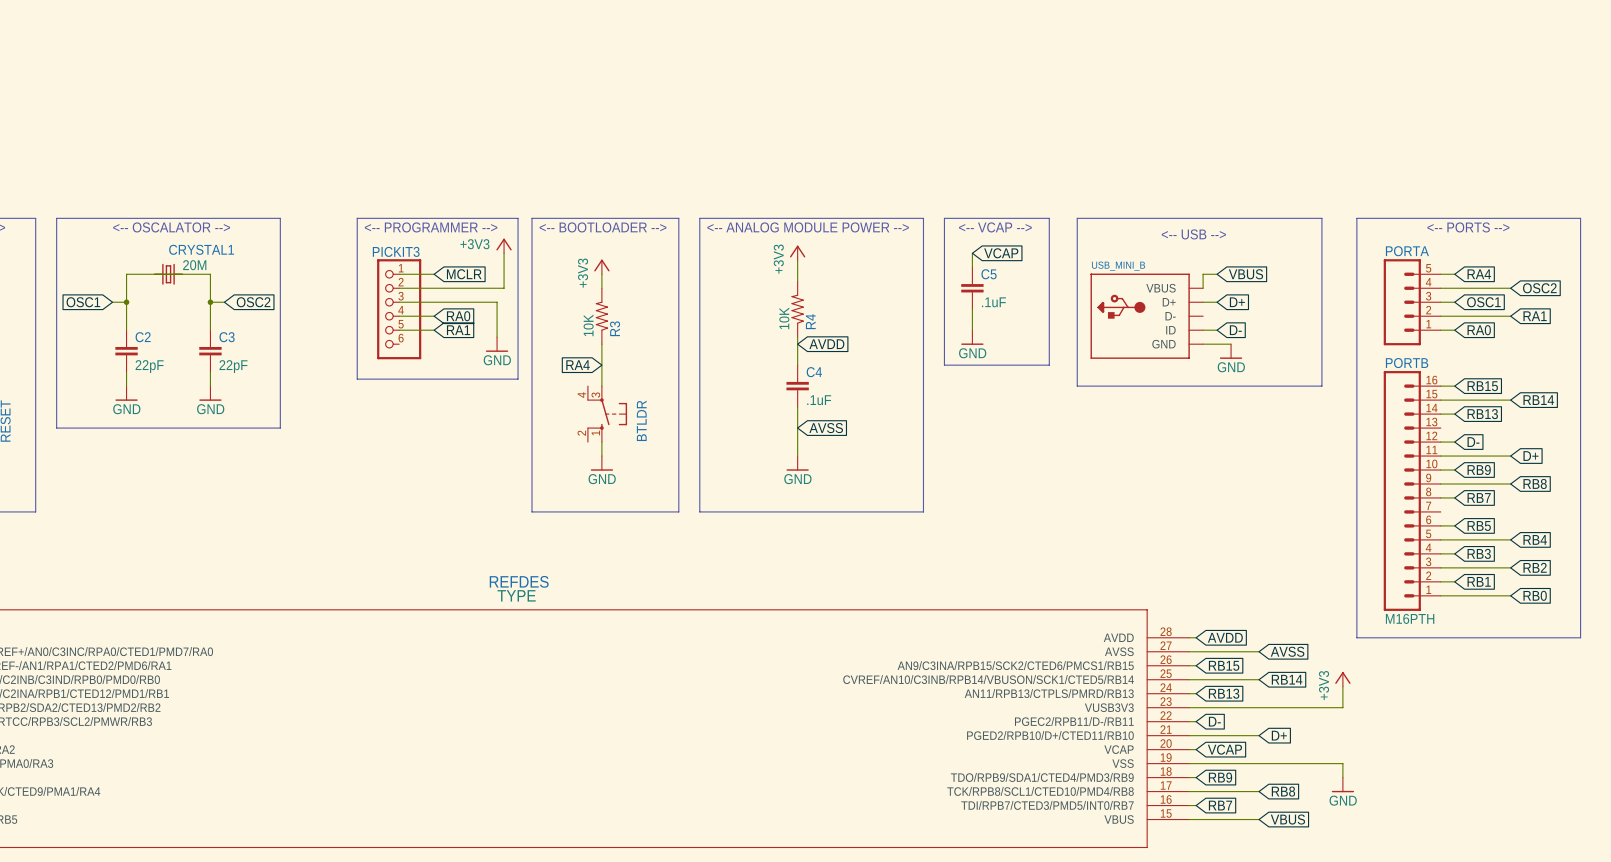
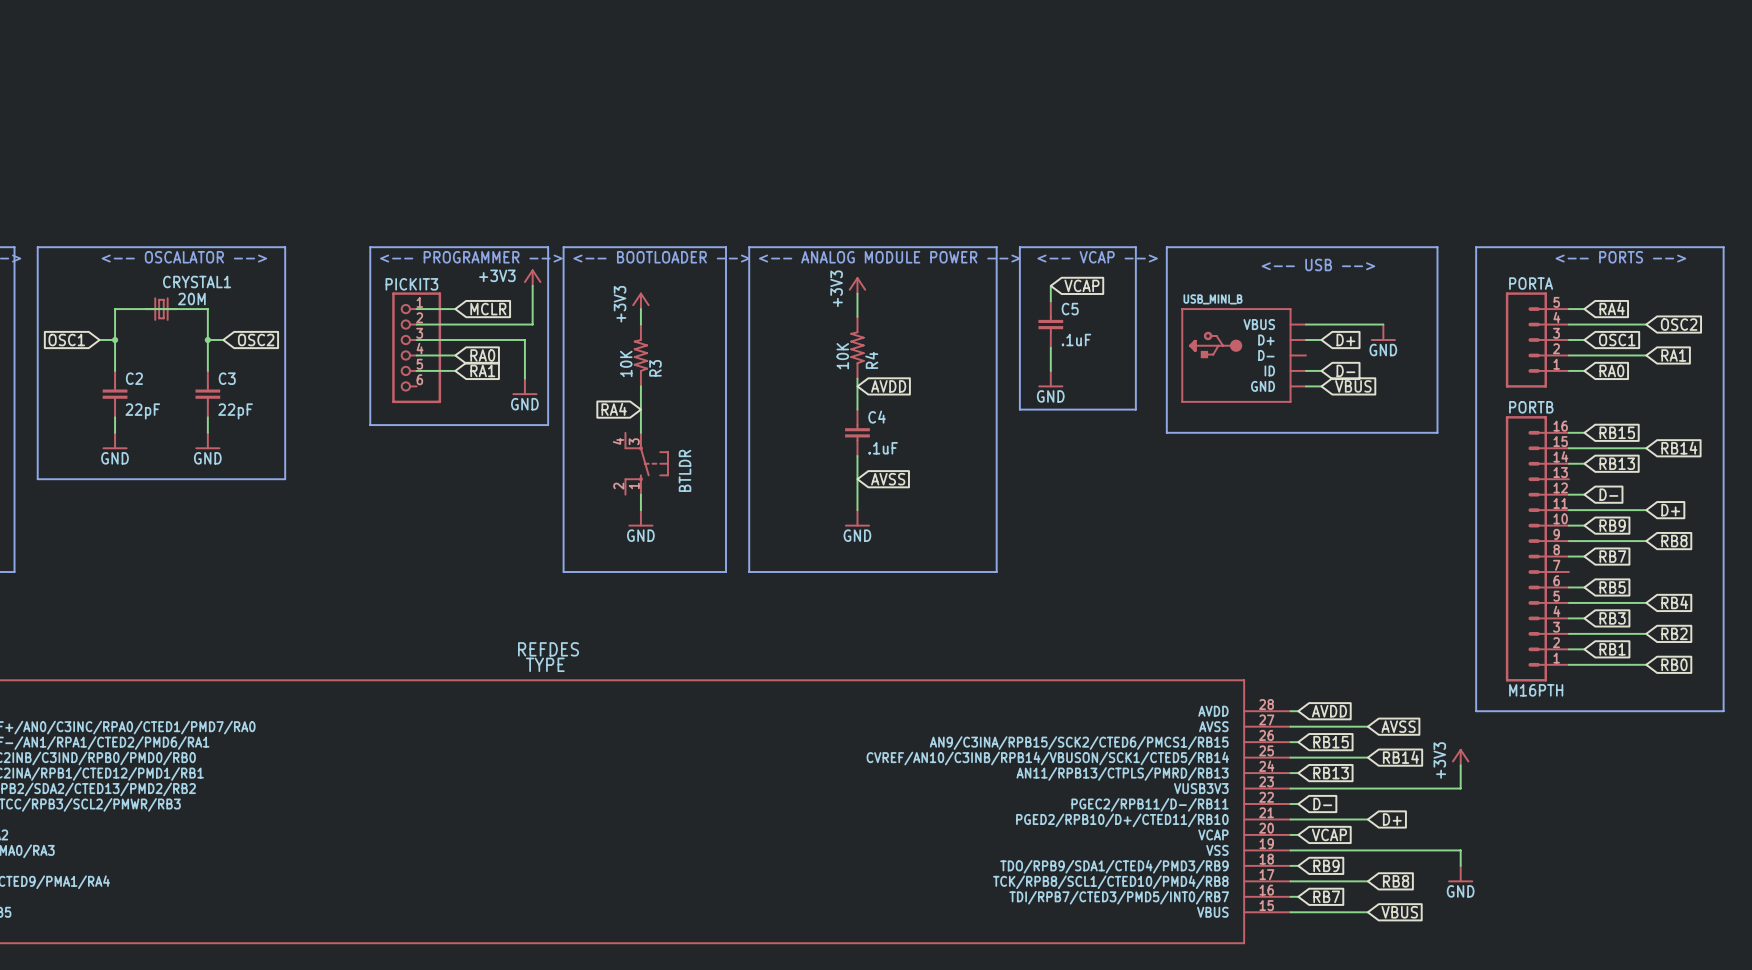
wire: (1217, 274) (1203, 274) (1203, 288) -> (1383, 324) (1306, 324)
global label position: VBUS (1245, 274) -> VBUS (1353, 386)
wire: (1217, 344) (1231, 344) -> none
power symbol position: GND (1231, 351) -> GND (1383, 332)

